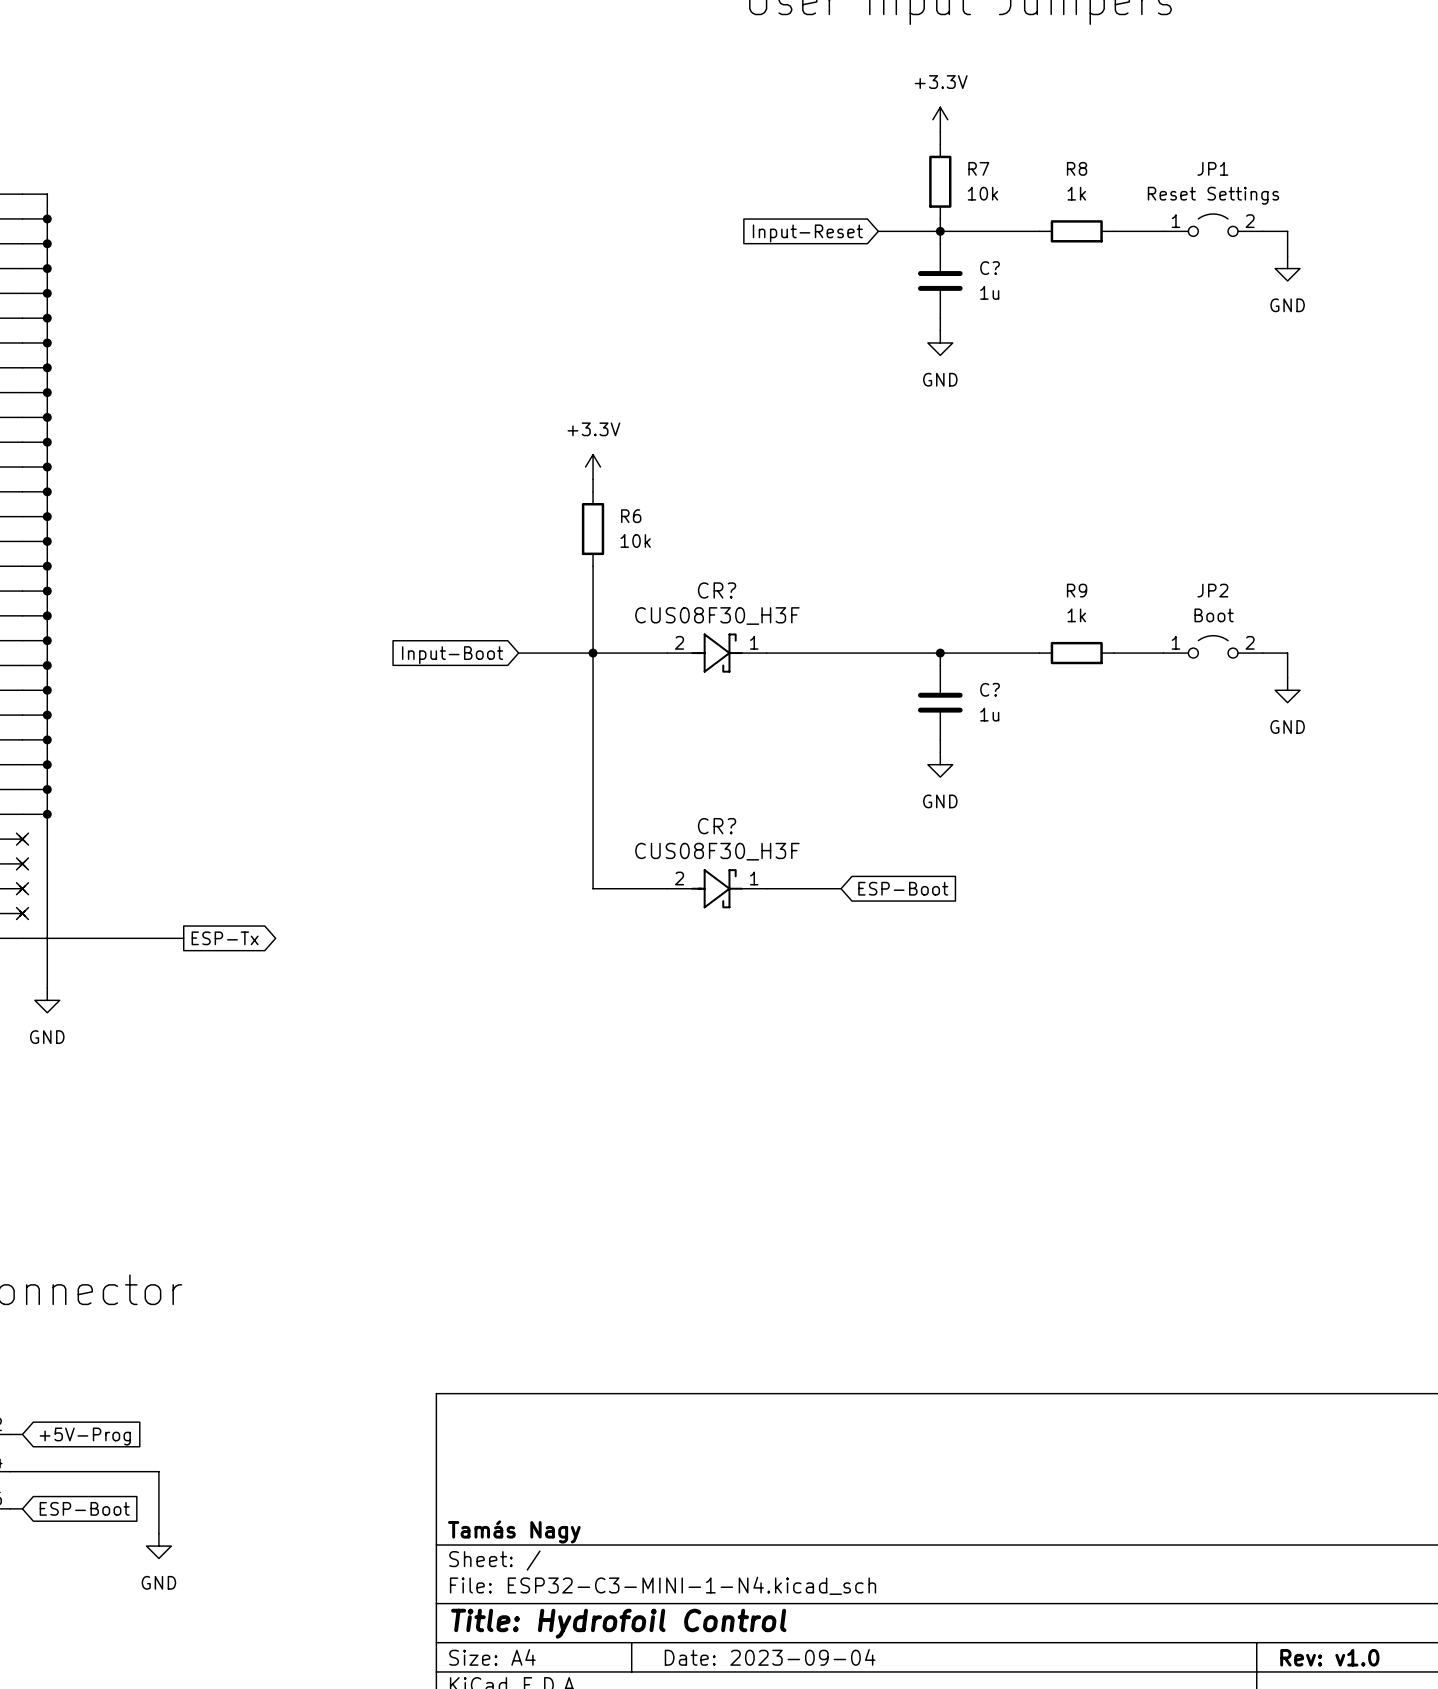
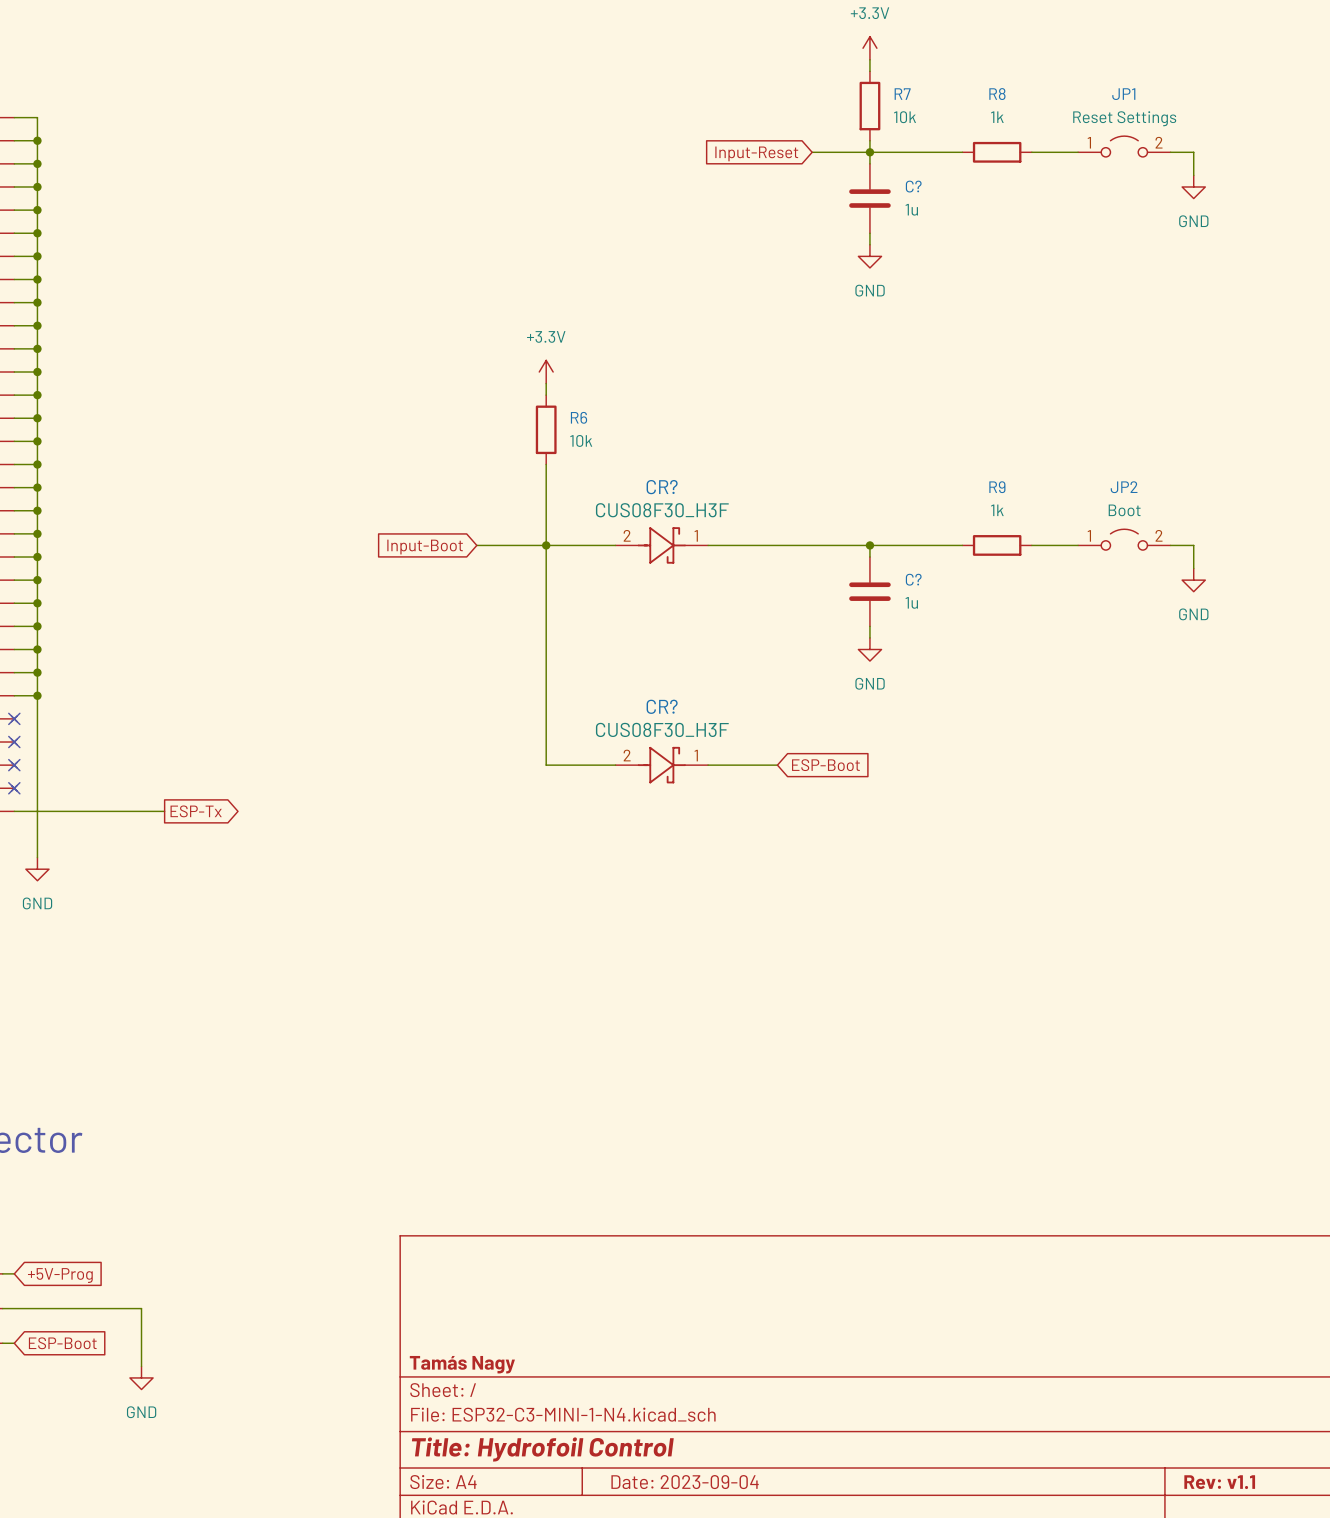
title block: Rev: v1.0 (1329, 1657) -> Rev: v1.1 (1219, 1482)

